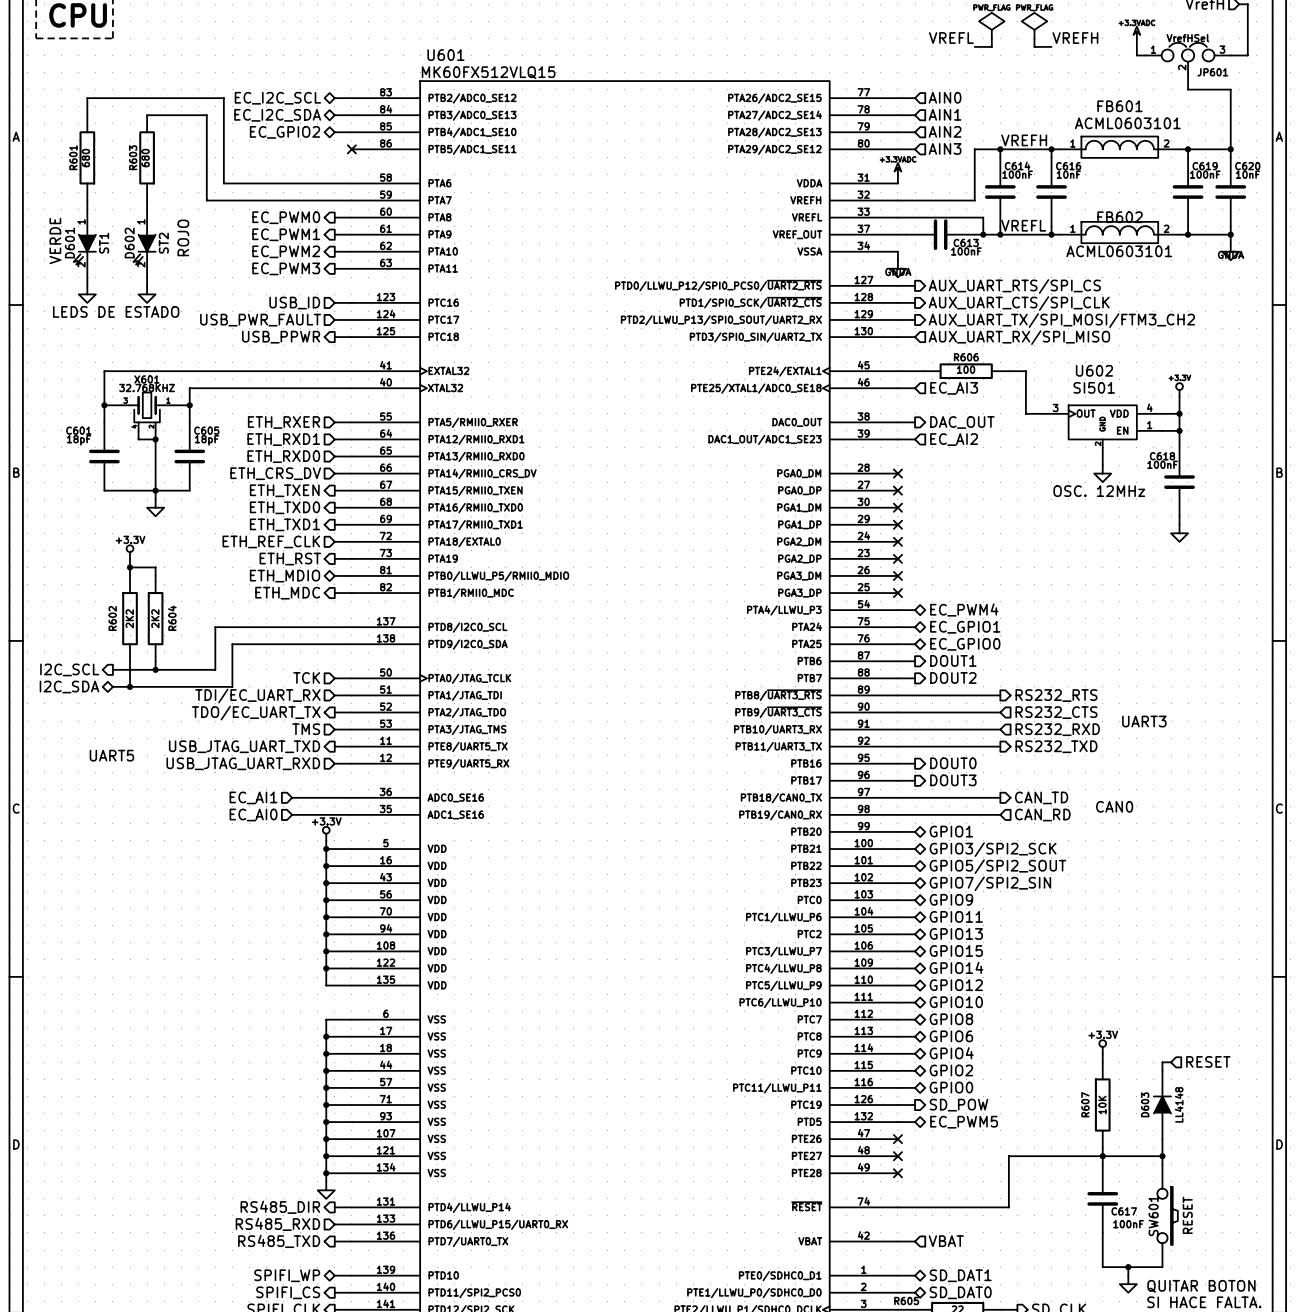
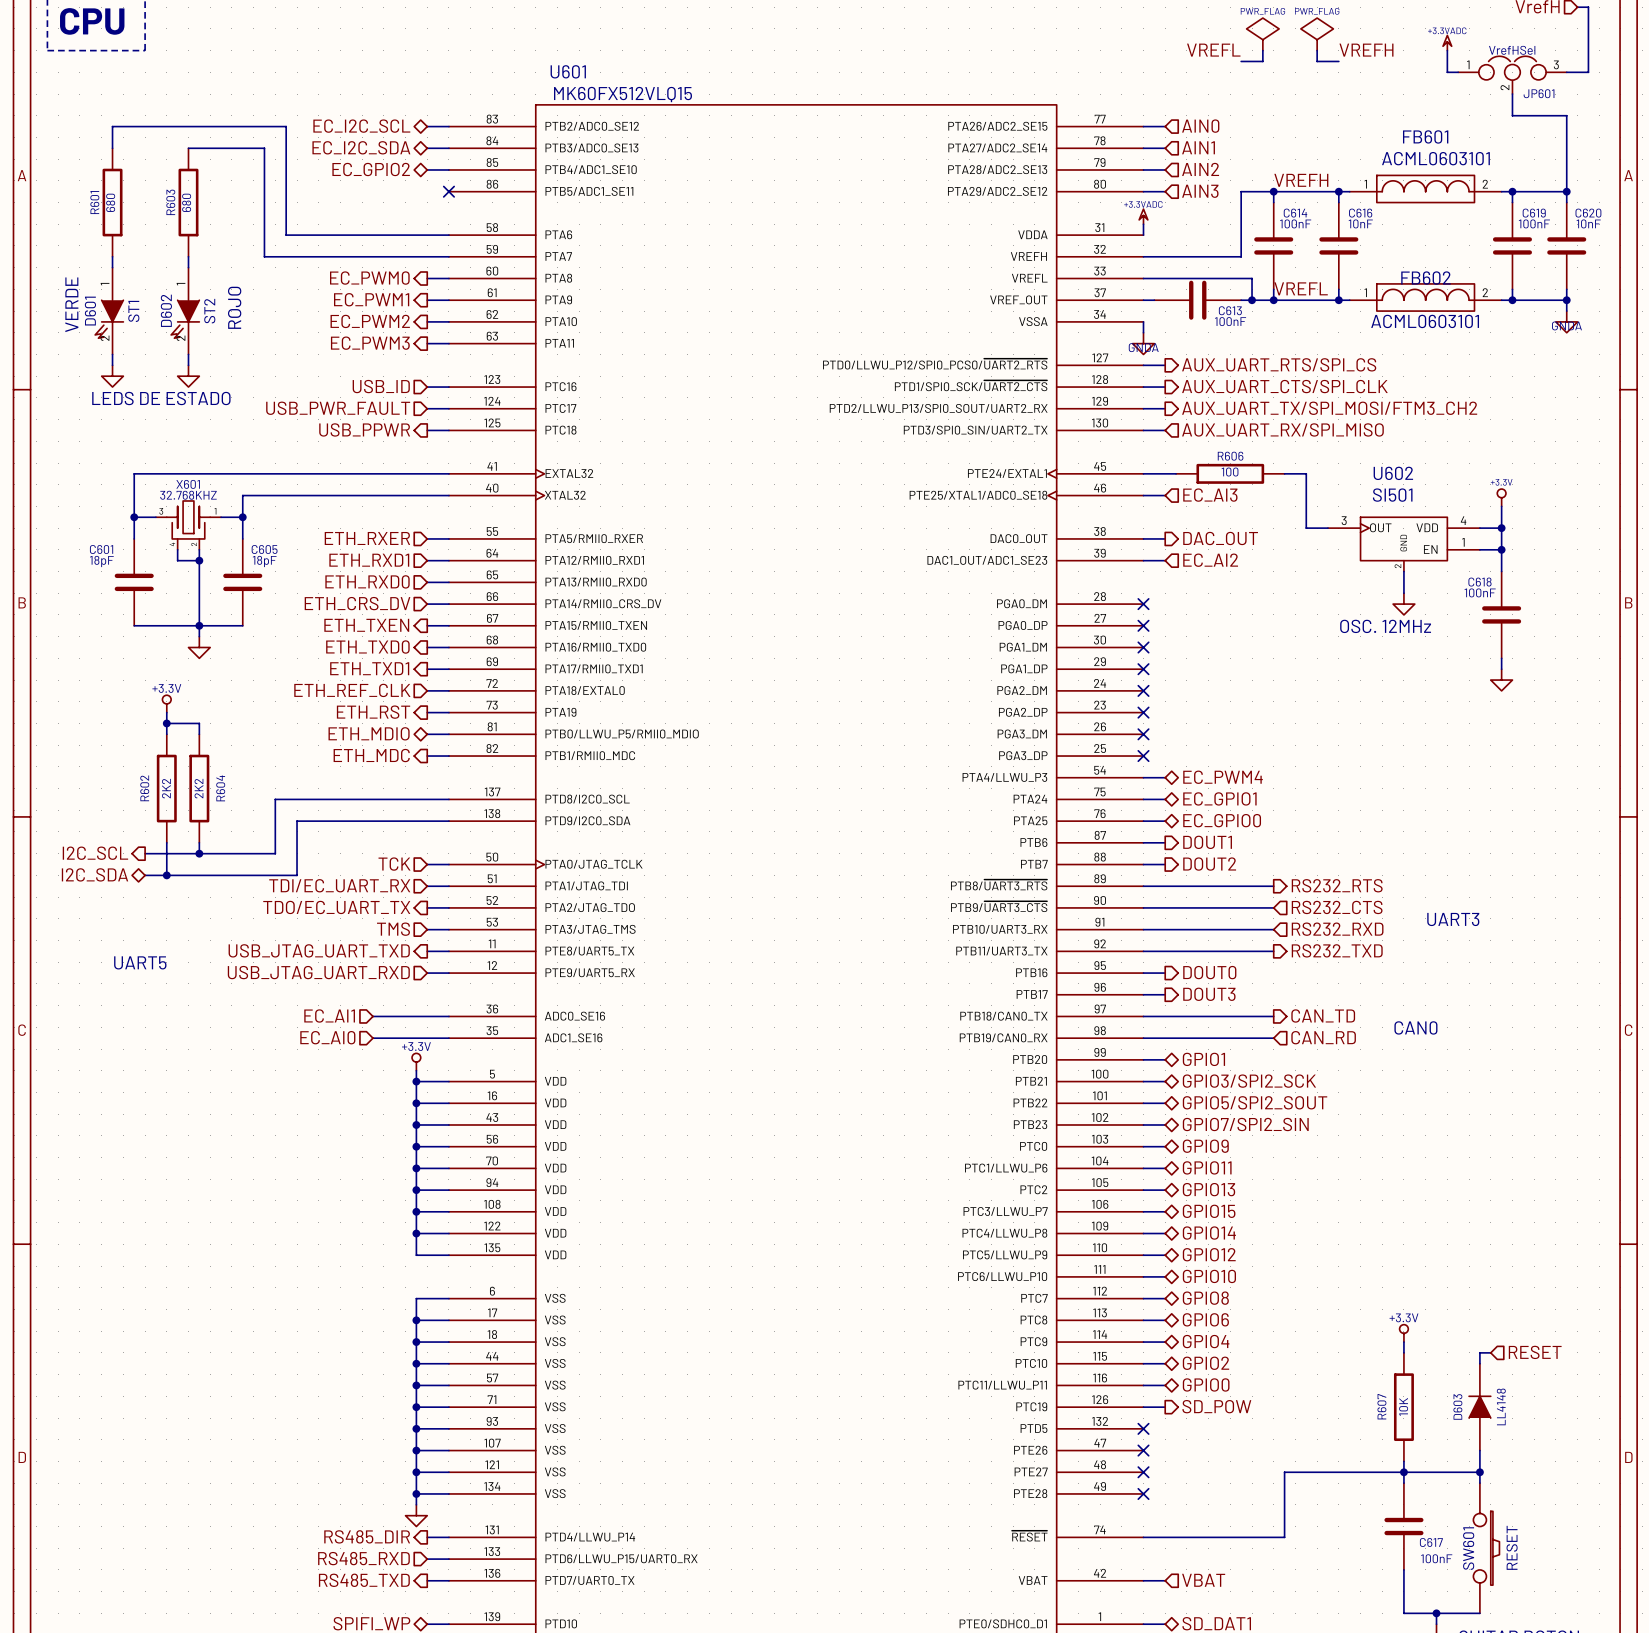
wire: (897, 1122) (915, 1122) -> none
no-connect mark: none -> (1143, 1428)
hierarchical label: EC_PWM5 (964, 1122) -> none

